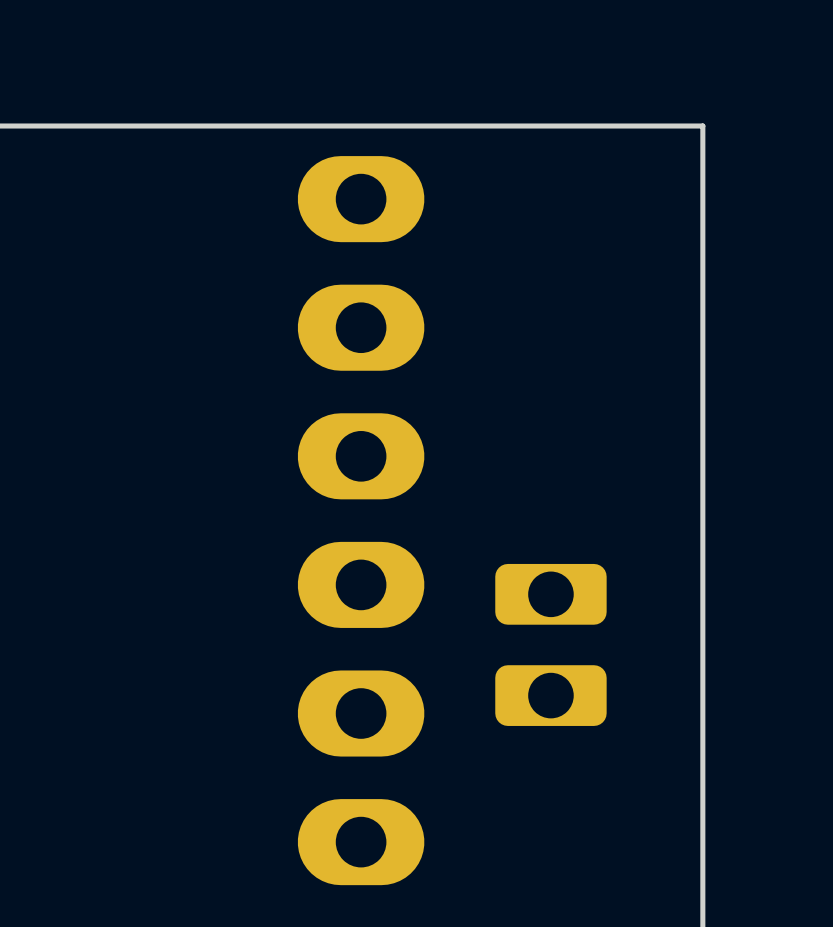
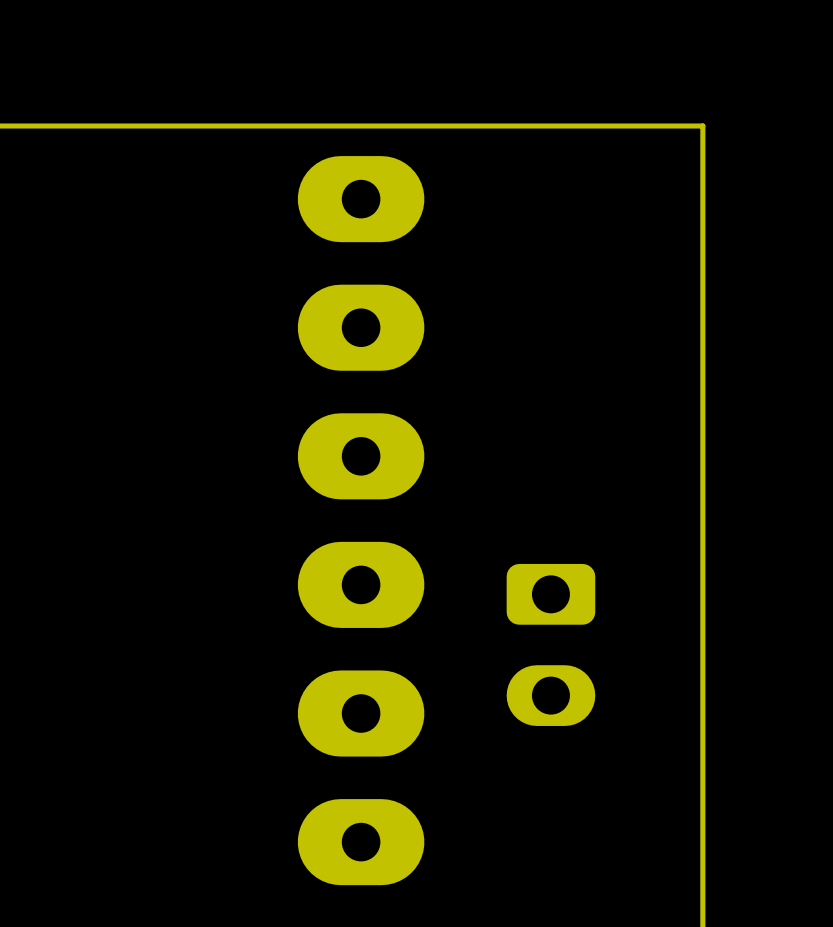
part footprint: [297, 156, 425, 886] -> [297, 156, 425, 886]
part footprint: [495, 563, 607, 726] -> [506, 563, 596, 726]

